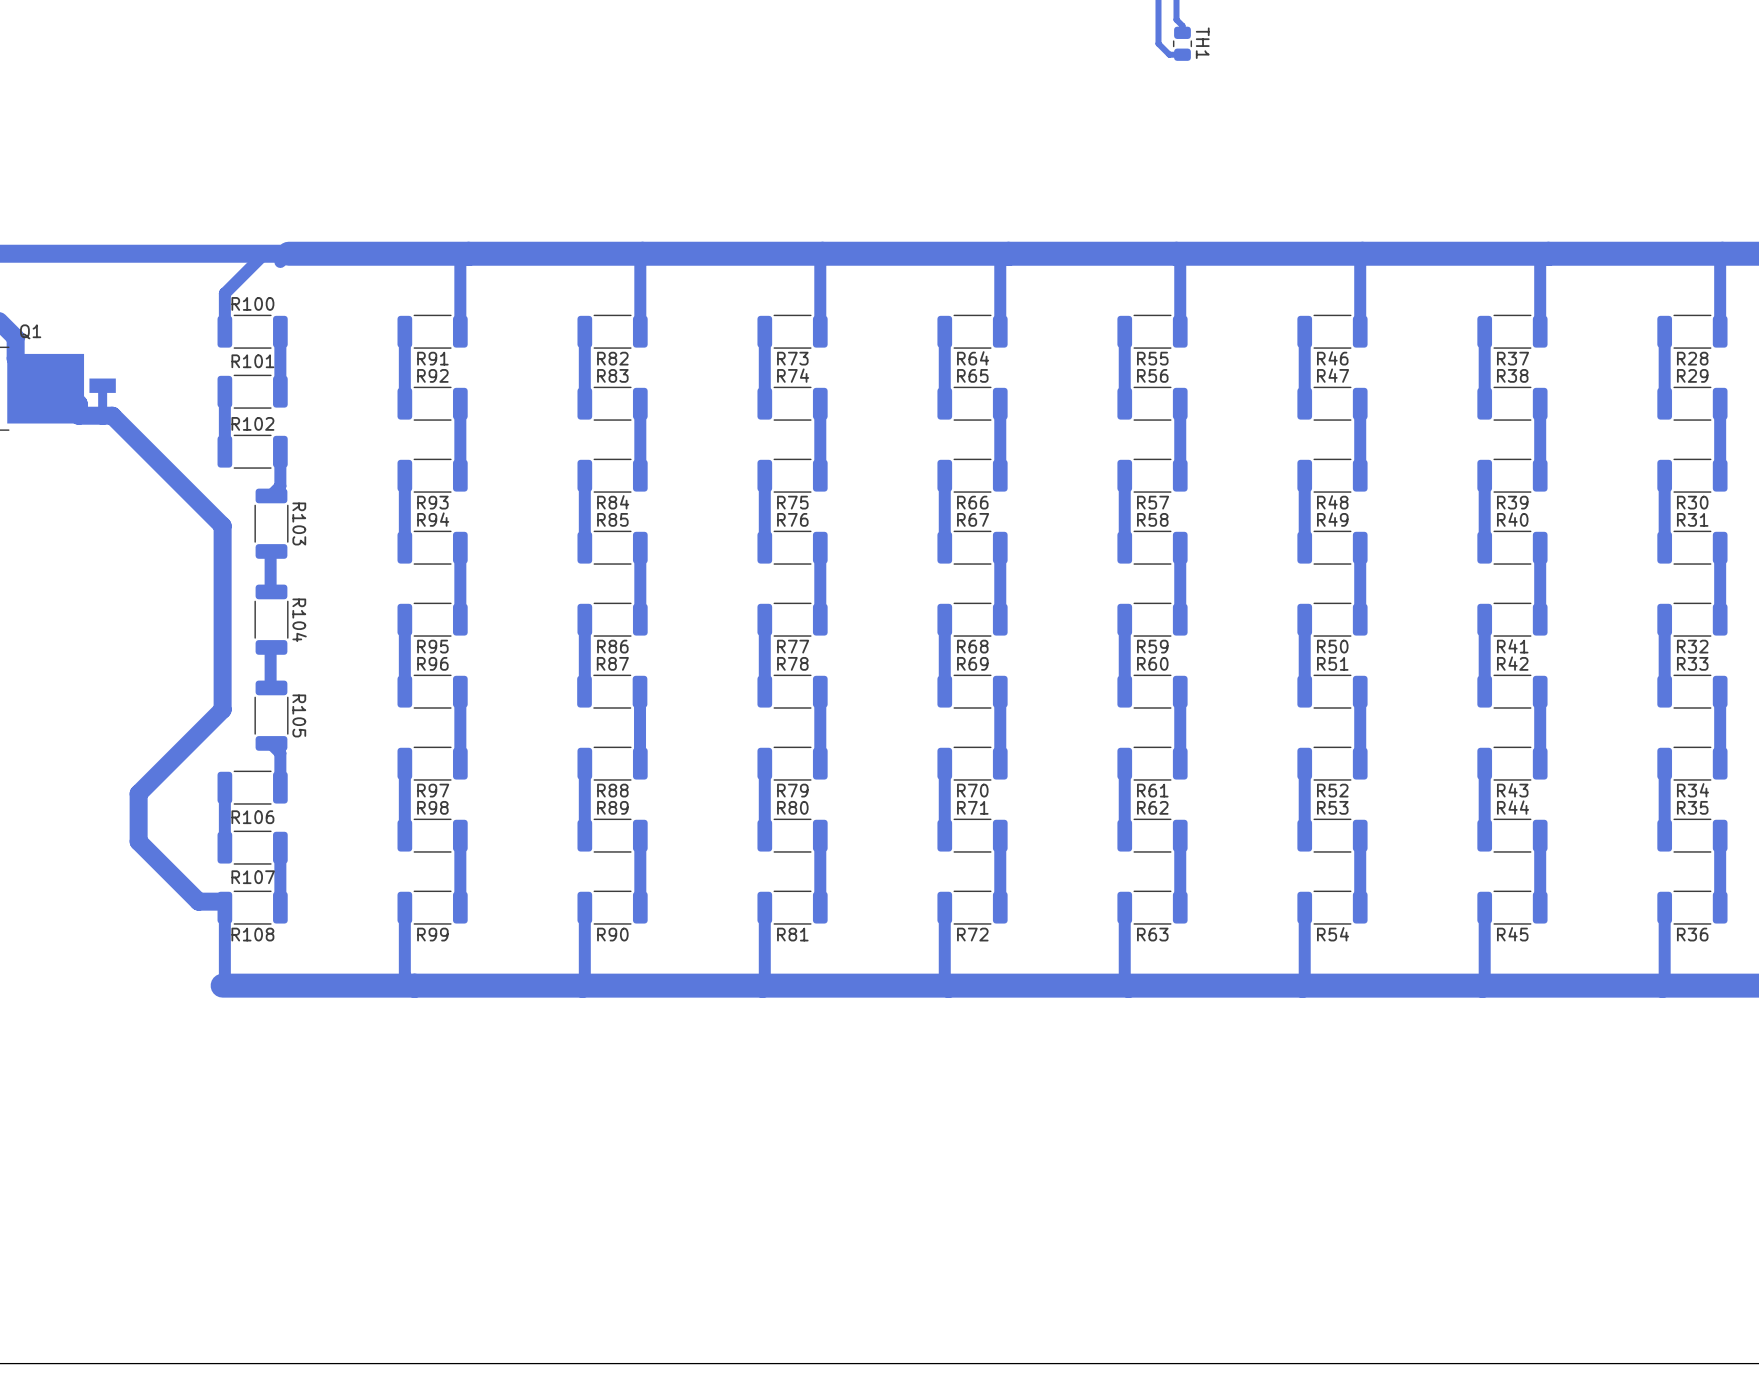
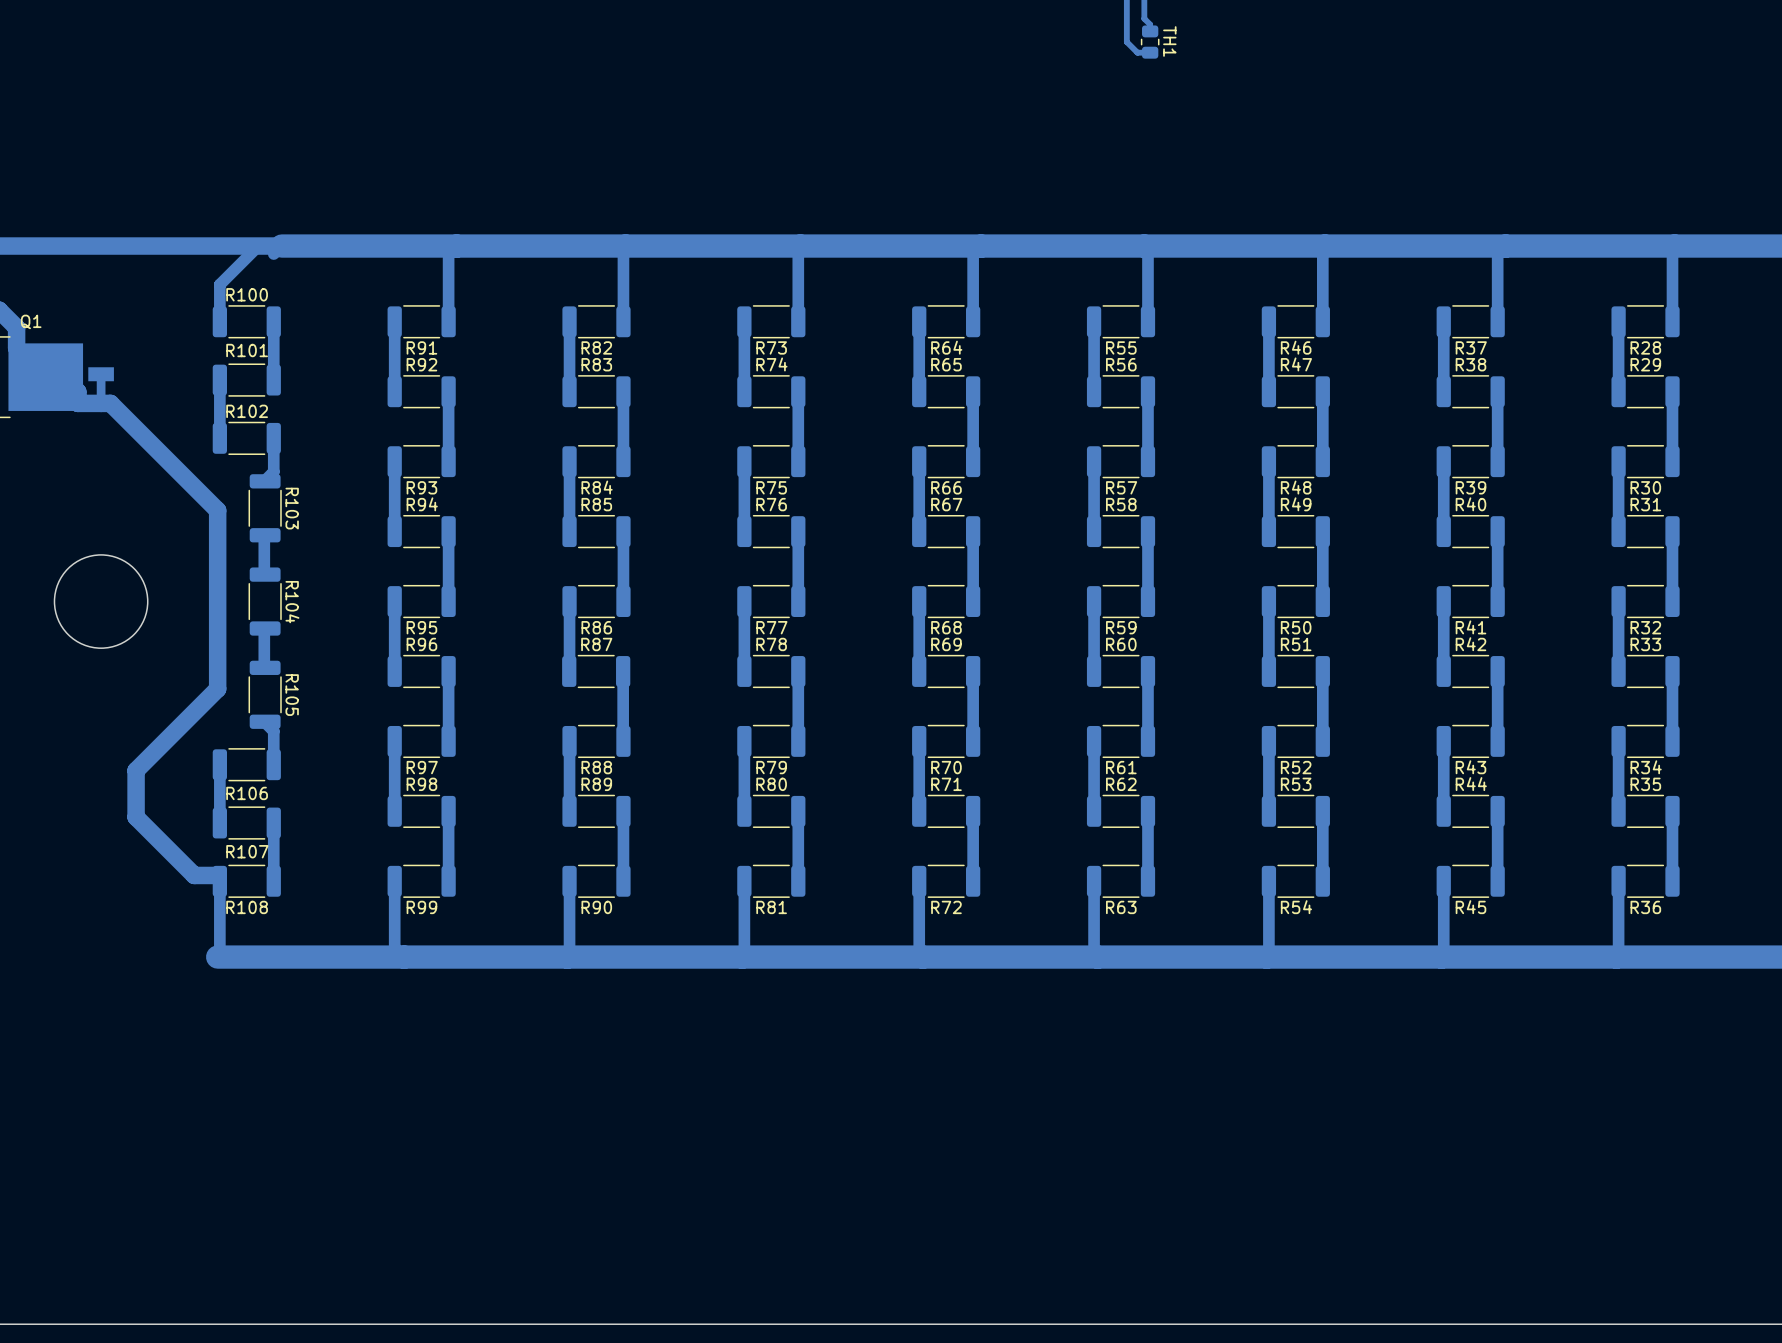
round board edge: none -> [54, 554, 149, 649]

